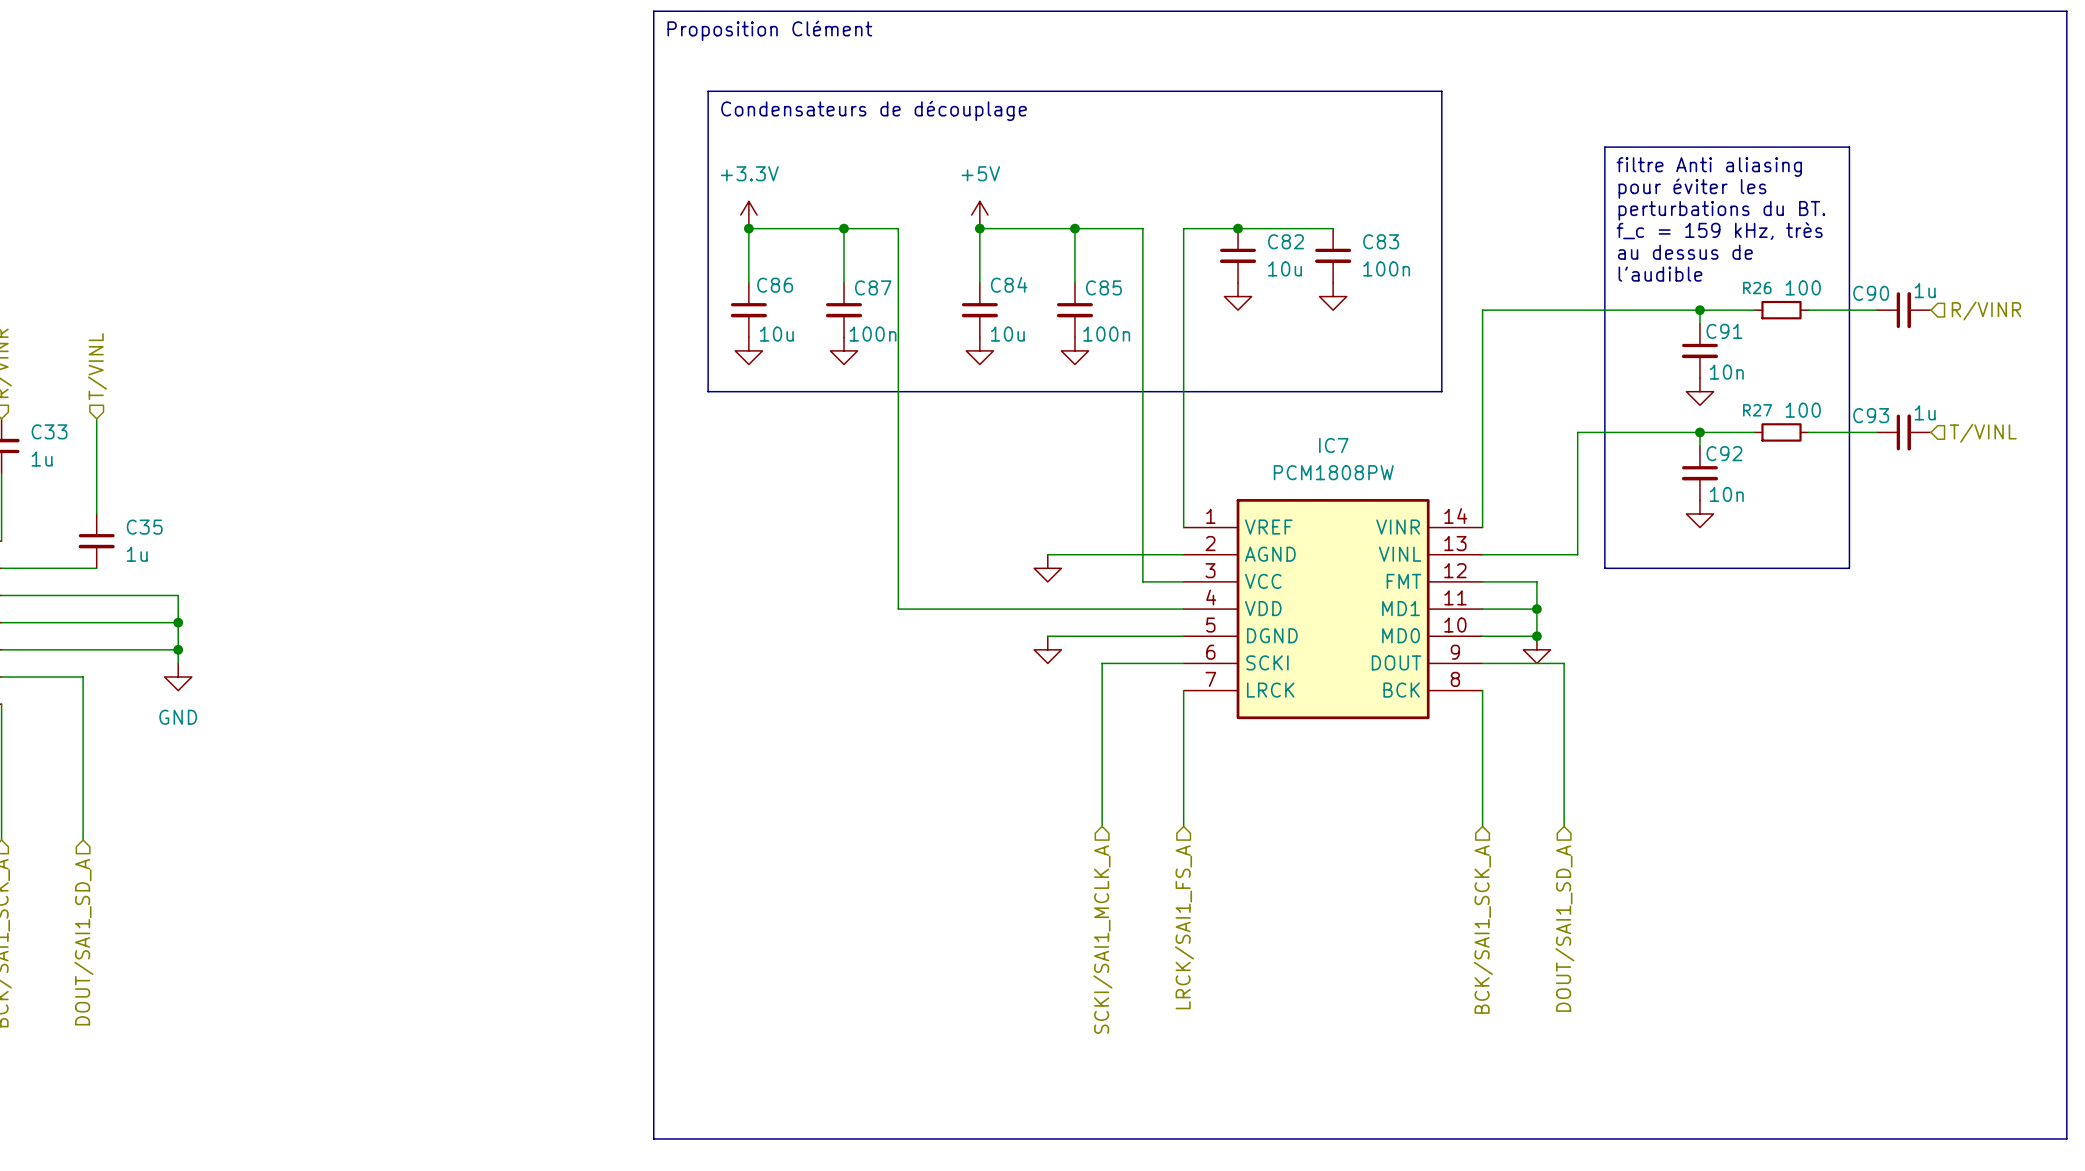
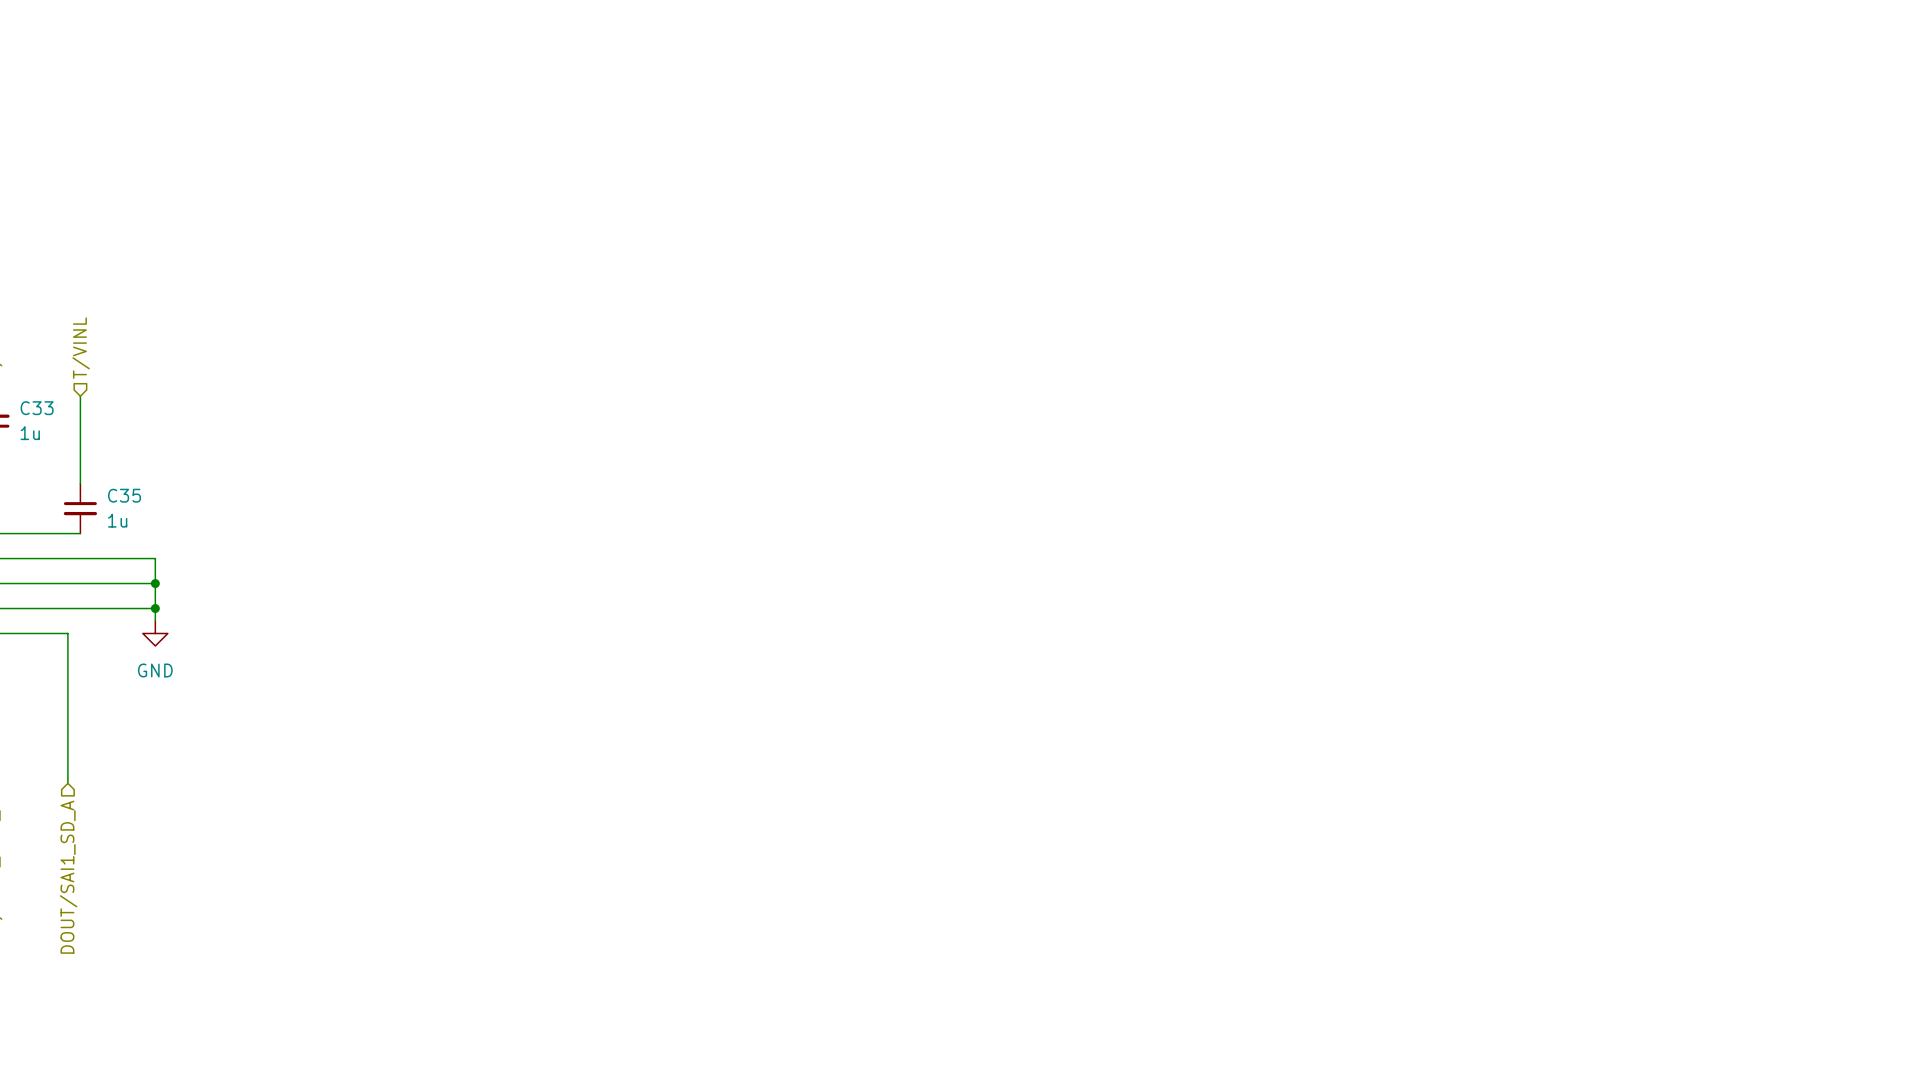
line: (653, 11) (2066, 11) (2066, 1138) (653, 1138) (653, 11) -> none
text: Proposition Clément (769, 30) -> none
line: (708, 91) (1441, 91) (1441, 391) (708, 391) (708, 91) -> none
text: Condensateurs de découplage (874, 110) -> none
line: (1604, 147) (1849, 147) (1849, 568) (1604, 568) (1604, 147) -> none
text: filtre Anti aliasing (1709, 167) -> none
text: pour éviter les (1692, 188) -> none
text: perturbations du BT. (1721, 210) -> none
power symbol: +3.3V (748, 215) -> none
power symbol: +5V (979, 215) -> none
junction: (748, 228) -> none
wire: (843, 228) (843, 282) -> none
junction: (843, 228) -> none
junction: (979, 228) -> none
wire: (1074, 228) (1074, 282) -> none
junction: (1074, 228) -> none
junction: (1238, 228) -> none
wire: (1333, 228) (1183, 228) (1183, 527) -> none
text: f_c = 159 kHz, très (1719, 231) -> none
text: au dessus de (1685, 252) -> none
C82: 10u (1238, 255) -> none
C83: 100n (1333, 255) -> none
text: l'audible (1660, 274) -> none
wire: (748, 282) (748, 228) (898, 228) (898, 609) (1183, 609) -> none
wire: (979, 282) (979, 228) (1142, 228) (1142, 581) (1183, 581) -> none
power symbol: (1238, 296) -> none
power symbol: (1333, 296) -> none
C86: 10u (748, 310) -> none
C87: 100n (843, 310) -> none
C84: 10u (979, 310) -> none
C85: 100n (1074, 310) -> none
wire: (1699, 310) (1699, 323) -> none
junction: (1699, 310) -> none
wire: (1754, 310) (1482, 310) (1482, 527) -> none
R26: 100 (1781, 310) -> none
wire: (1808, 310) (1876, 310) -> none
C90: 1u (1903, 310) -> none
hierarchical label: R/VINR (1986, 310) -> none
power symbol: (748, 350) -> none
power symbol: (843, 350) -> none
power symbol: (979, 350) -> none
power symbol: (1074, 350) -> none
C91: 10n (1699, 350) -> none
power symbol: (1699, 391) -> none
wire: (1699, 432) (1699, 446) -> none
junction: (1699, 432) -> none
wire: (1754, 432) (1577, 432) (1577, 554) (1482, 554) -> none
R27: 100 (1781, 432) -> none
wire: (1808, 432) (1876, 432) -> none
C93: 1u (1903, 432) -> none
hierarchical label: T/VINL (1983, 433) -> none
C92: 10n (1699, 473) -> none
power symbol: (1699, 513) -> none
wire: (1047, 554) (1183, 554) -> none
power symbol: (1047, 568) -> none
wire: (1482, 581) (1536, 581) (1536, 636) (1482, 636) -> none
IC7: PCM1808PW (1333, 609) -> none
wire: (1482, 609) (1536, 609) -> none
junction: (1536, 609) -> none
wire: (1047, 636) (1183, 636) -> none
junction: (1536, 636) -> none
power symbol: (1047, 649) -> none
power symbol: (1536, 649) -> none
wire: (1183, 663) (1102, 663) (1102, 826) -> none
wire: (1482, 663) (1564, 663) (1564, 826) -> none
wire: (1183, 690) (1183, 826) -> none
wire: (1482, 690) (1482, 826) -> none
hierarchical label: LRCK/SAI1_FS_A (1184, 927) -> none
hierarchical label: DOUT/SAI1_SD_A (1564, 928) -> none
hierarchical label: BCK/SAI1_SCK_A (1483, 929) -> none
hierarchical label: SCKI/SAI1_MCLK_A (1102, 939) -> none

